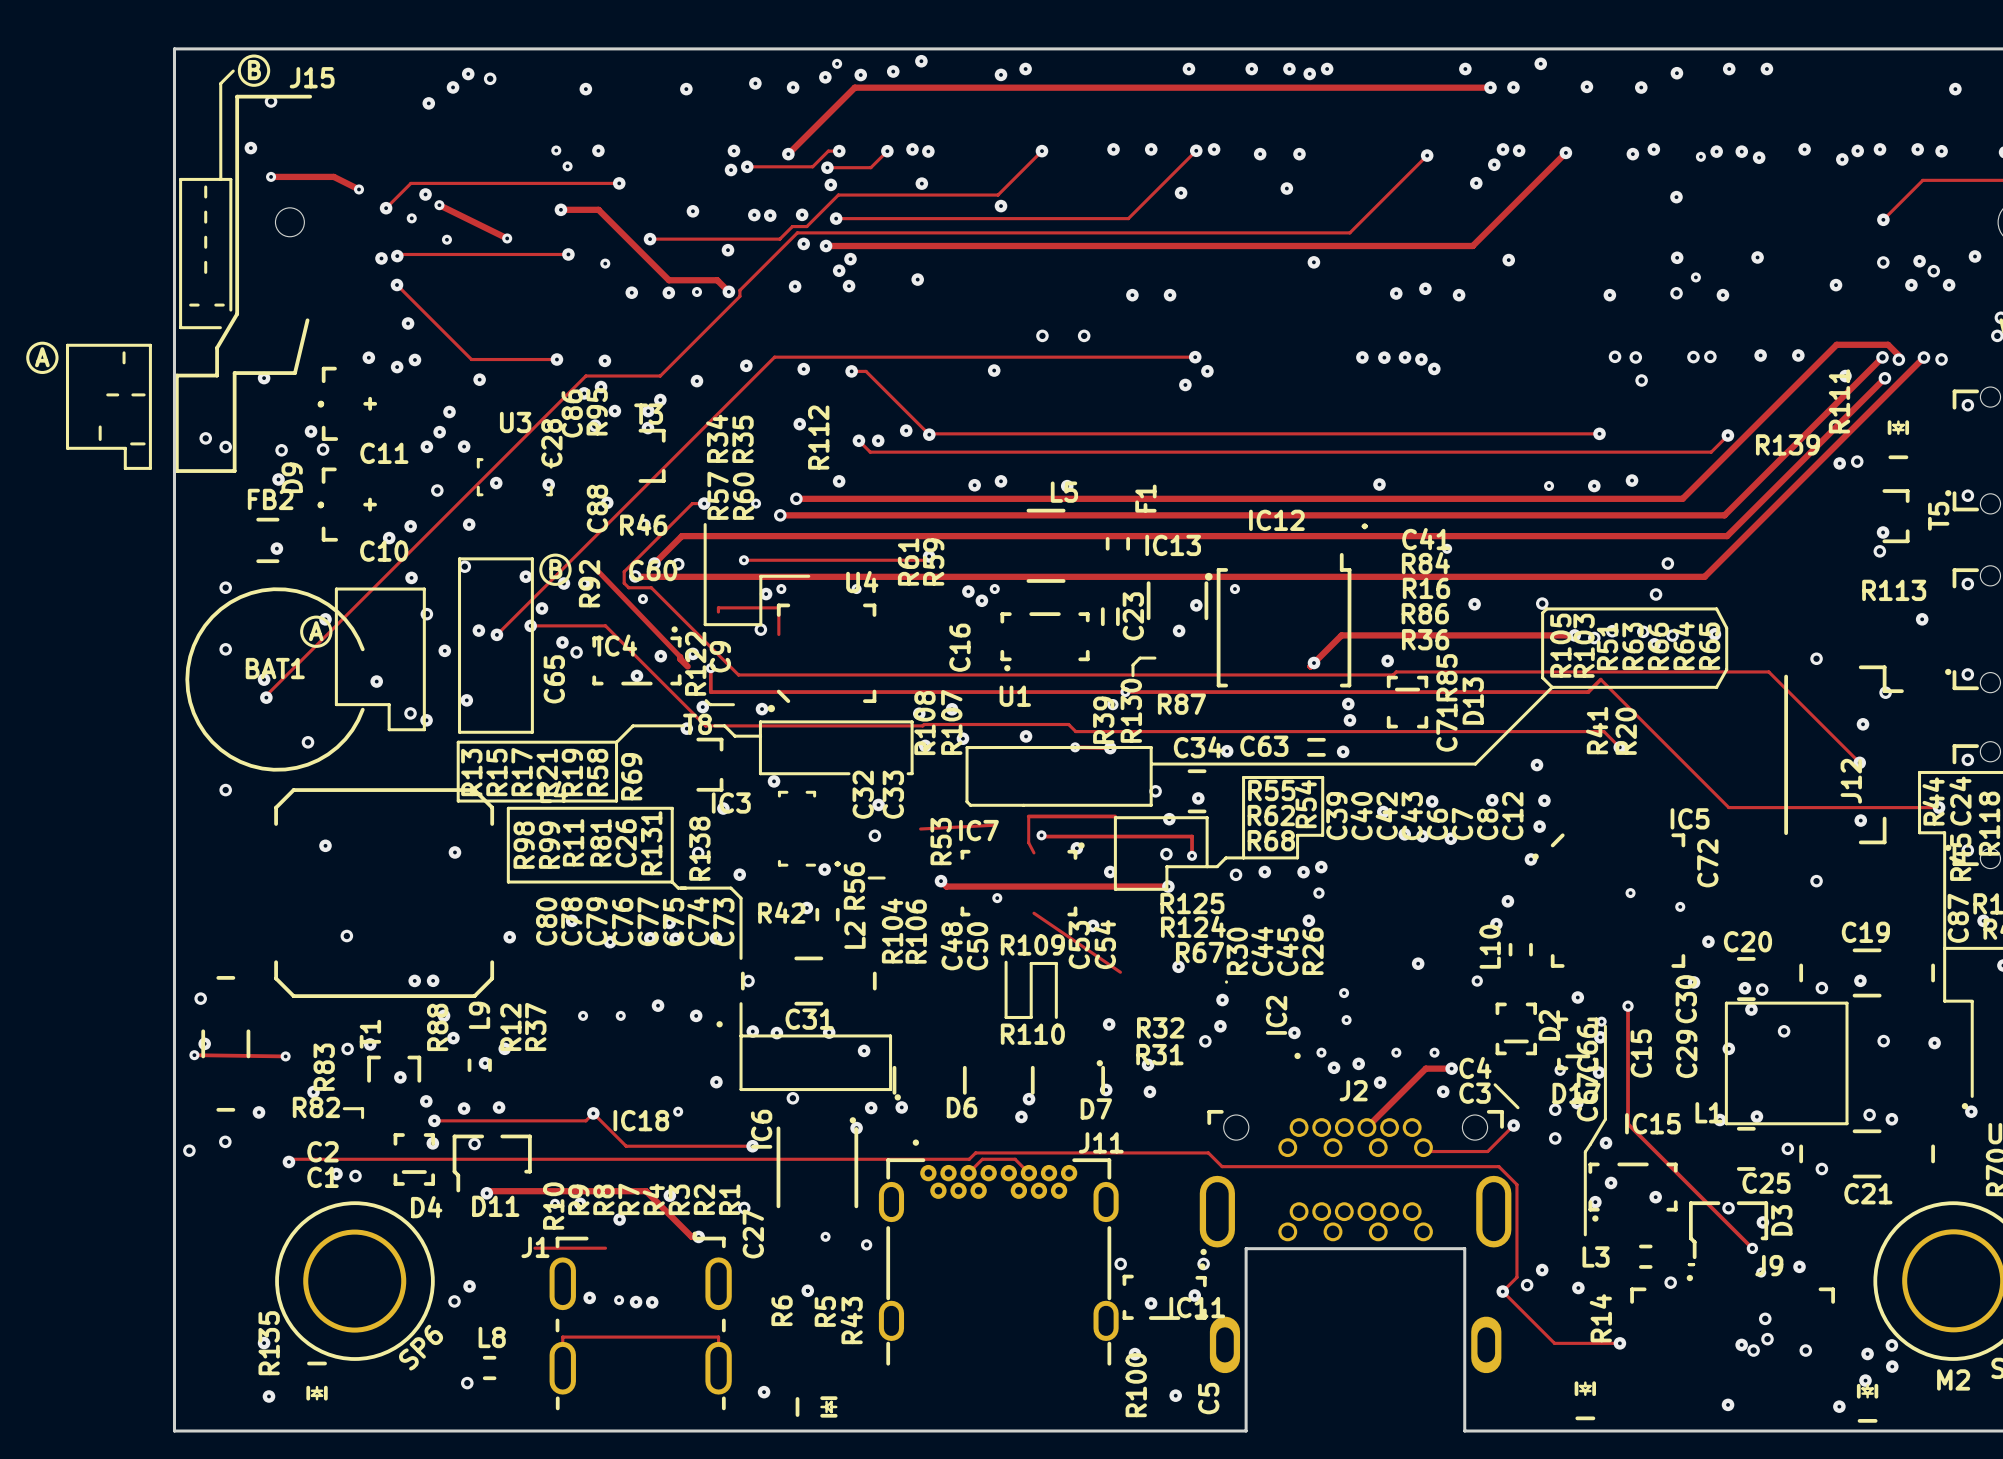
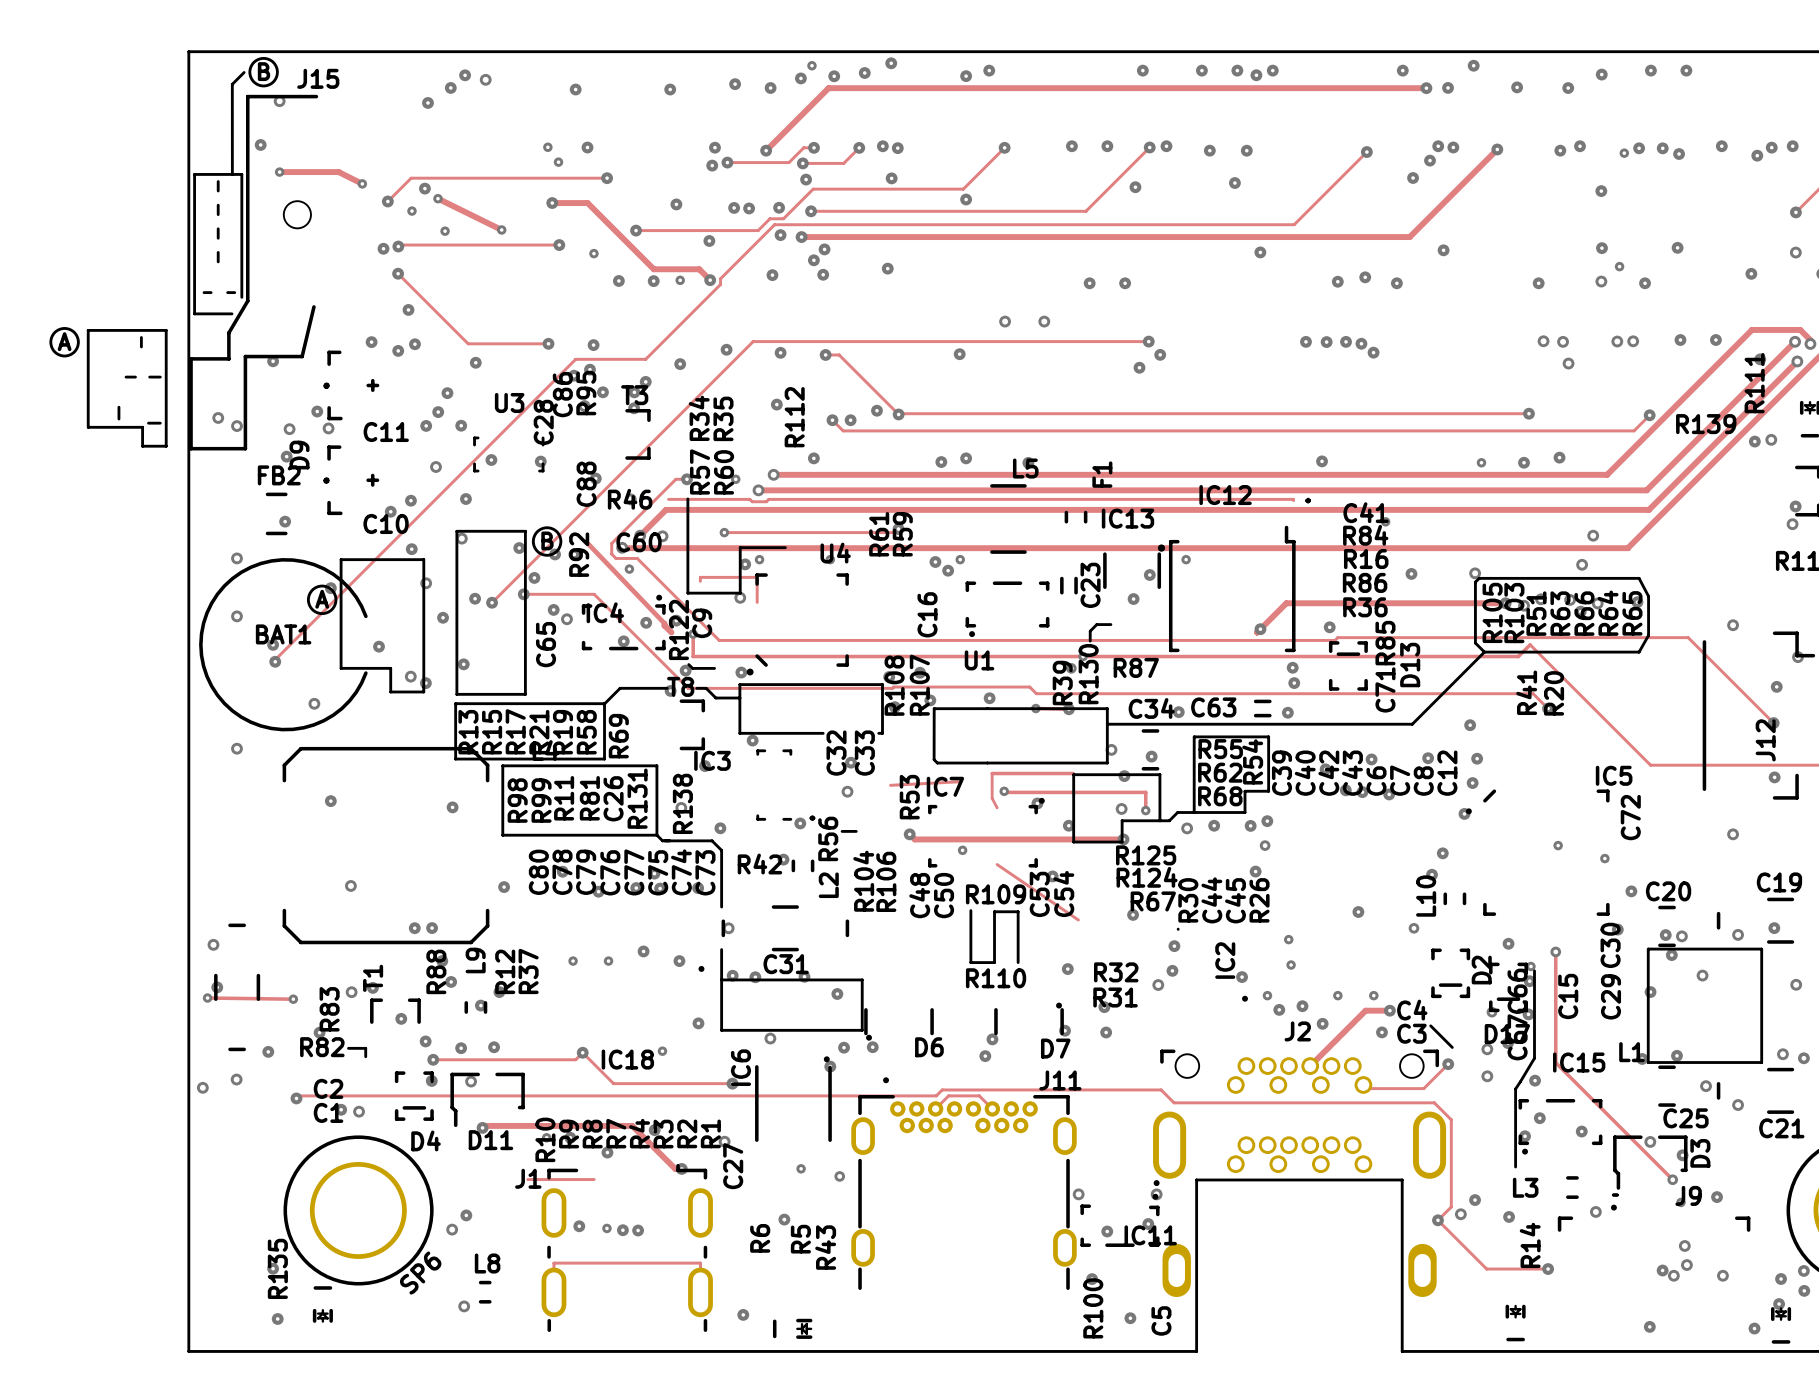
track: none -> (668, 499) (749, 499) (752, 501) (766, 501) (768, 499) (1293, 500)

